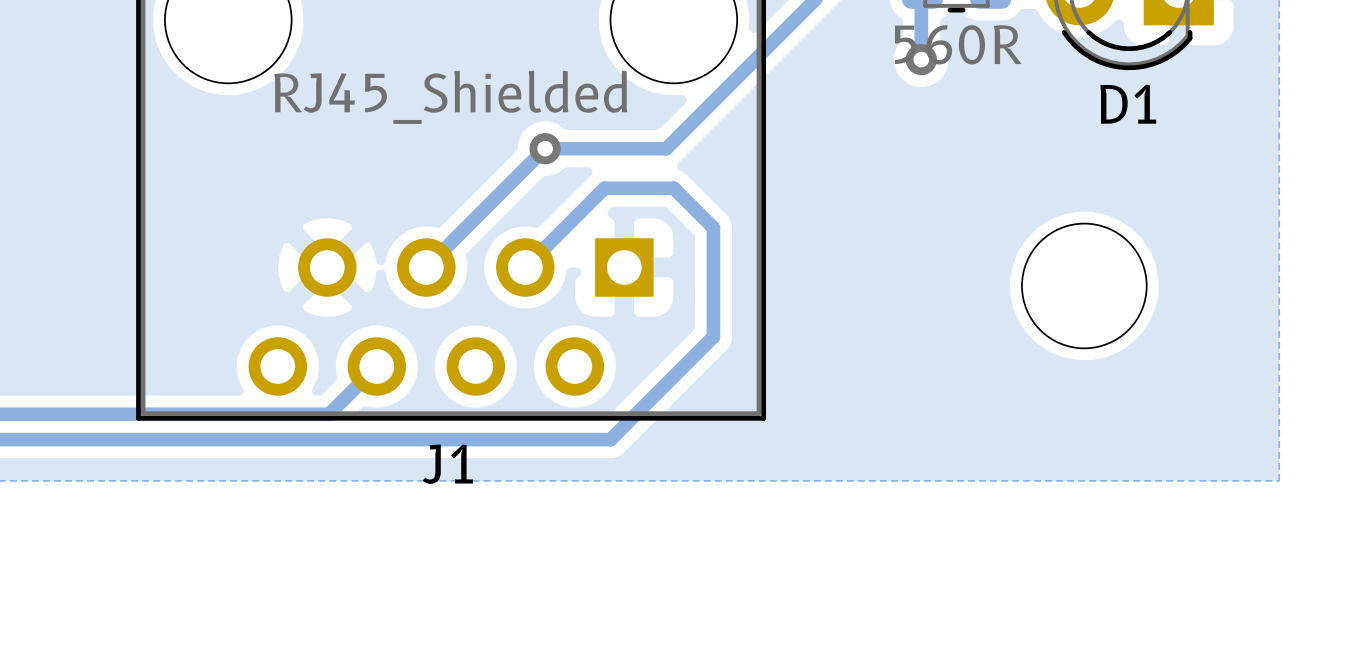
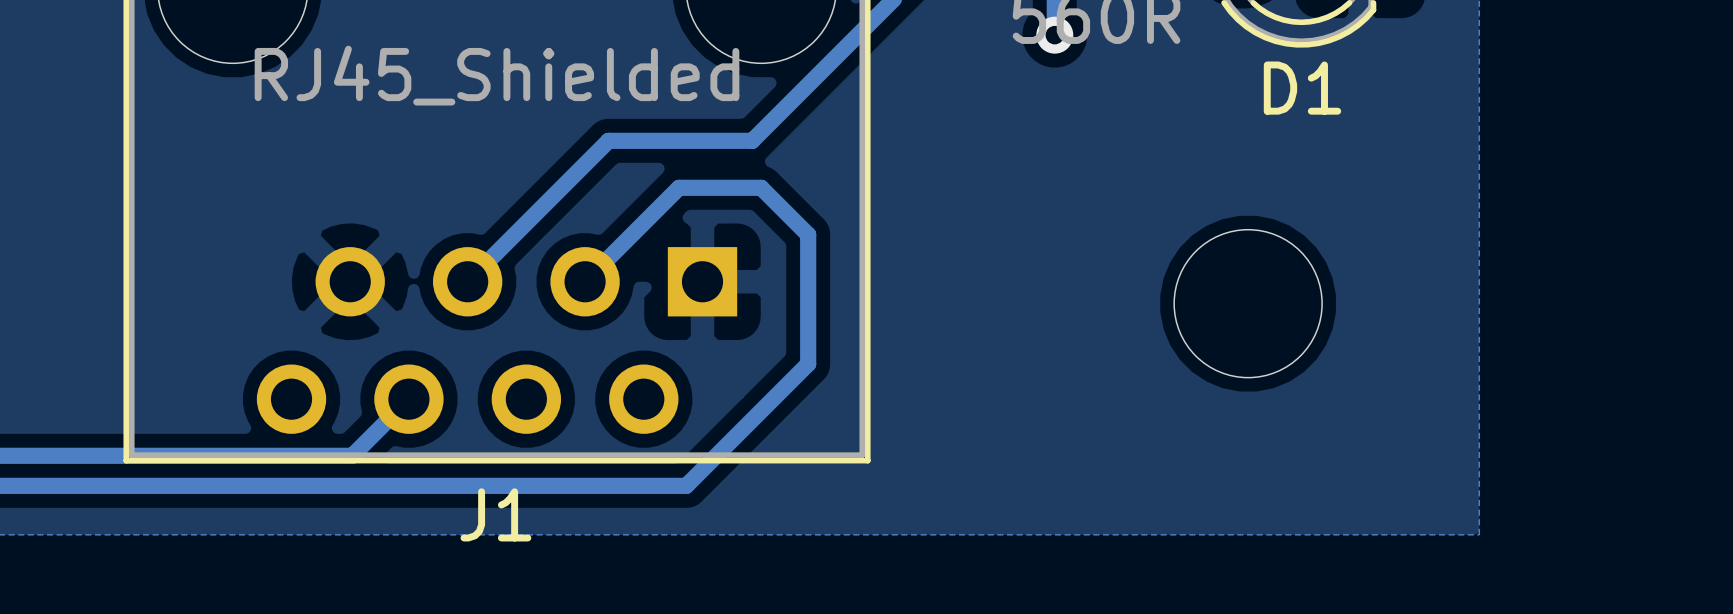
via: (545, 148) -> none

